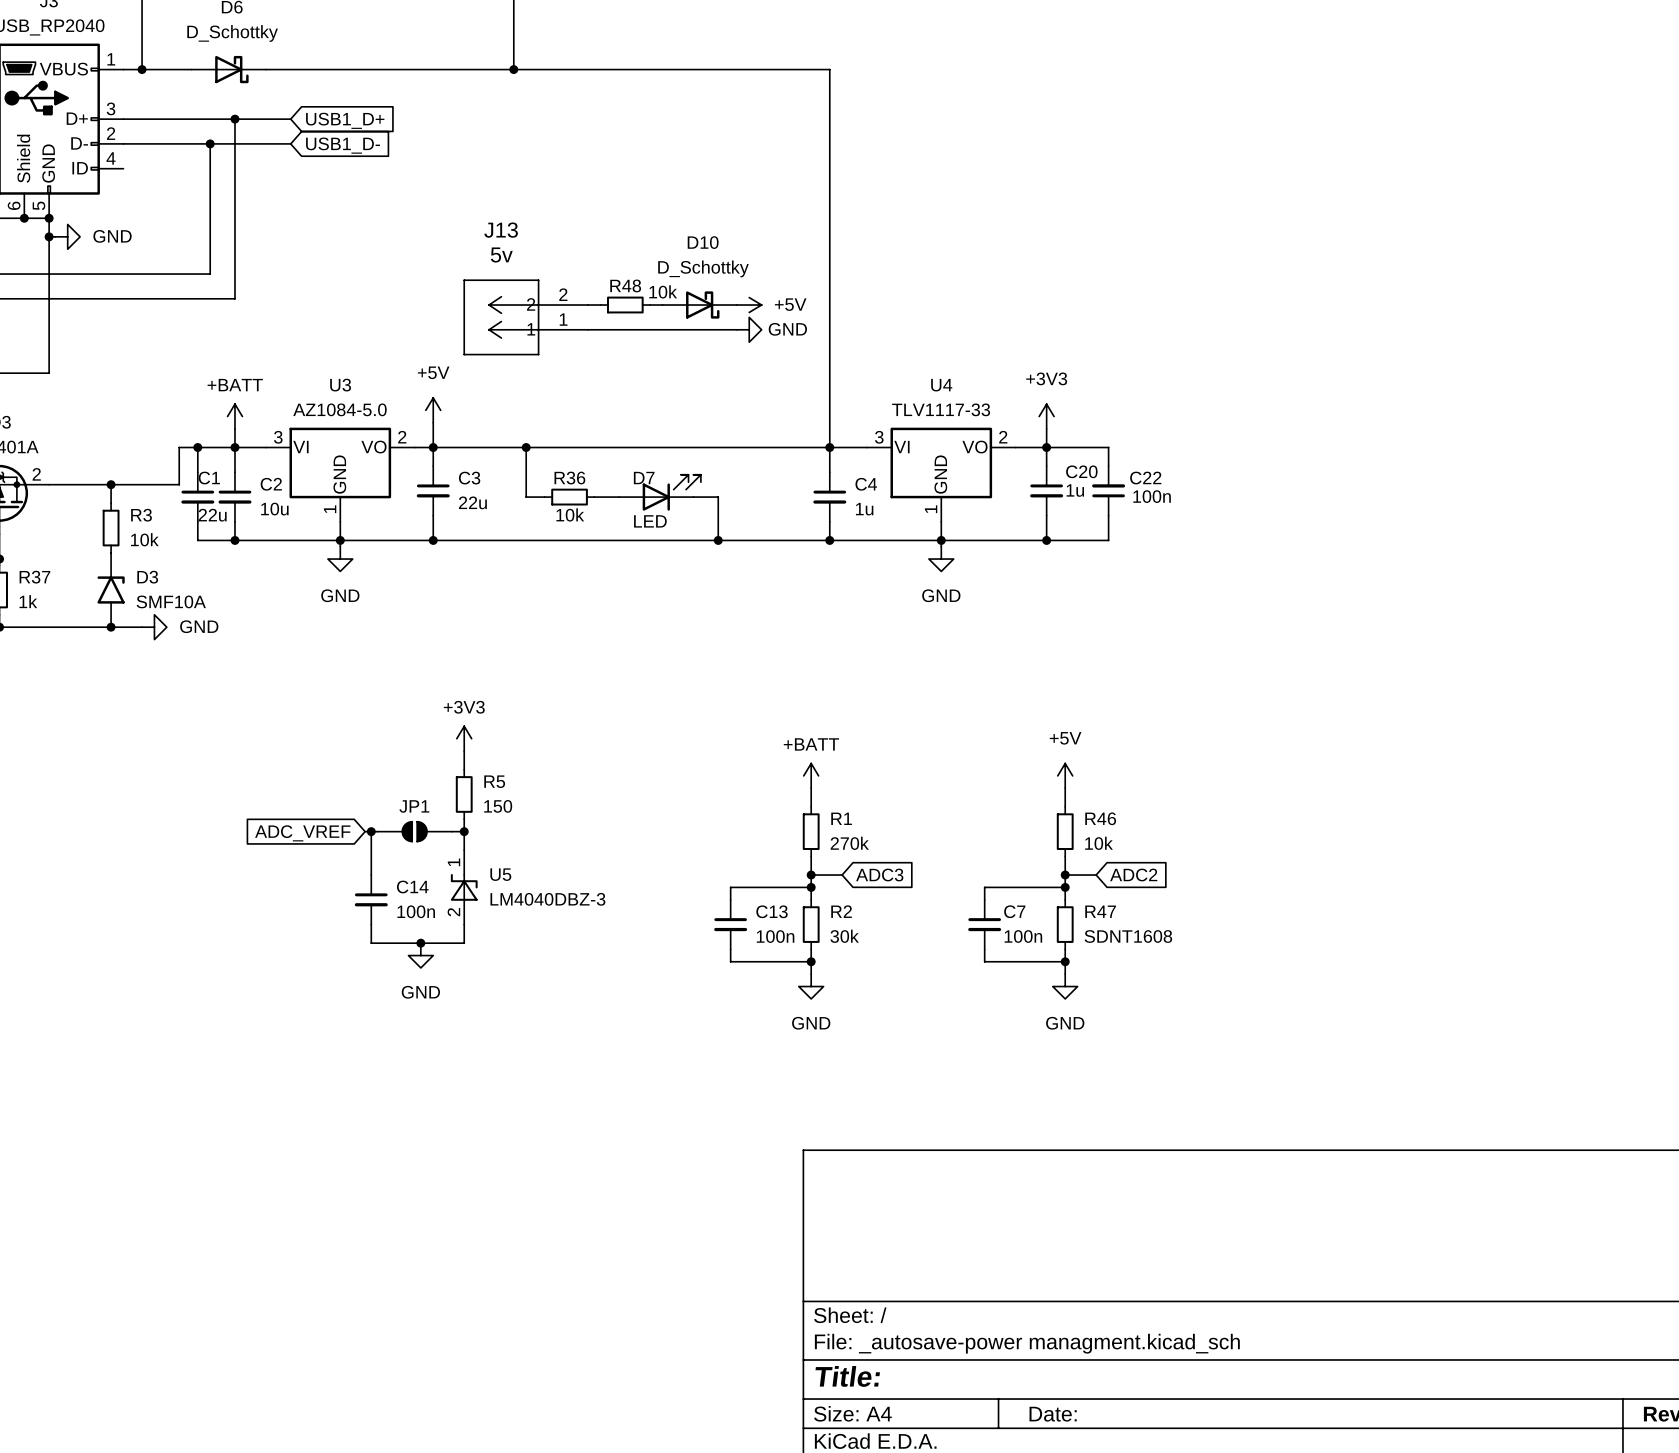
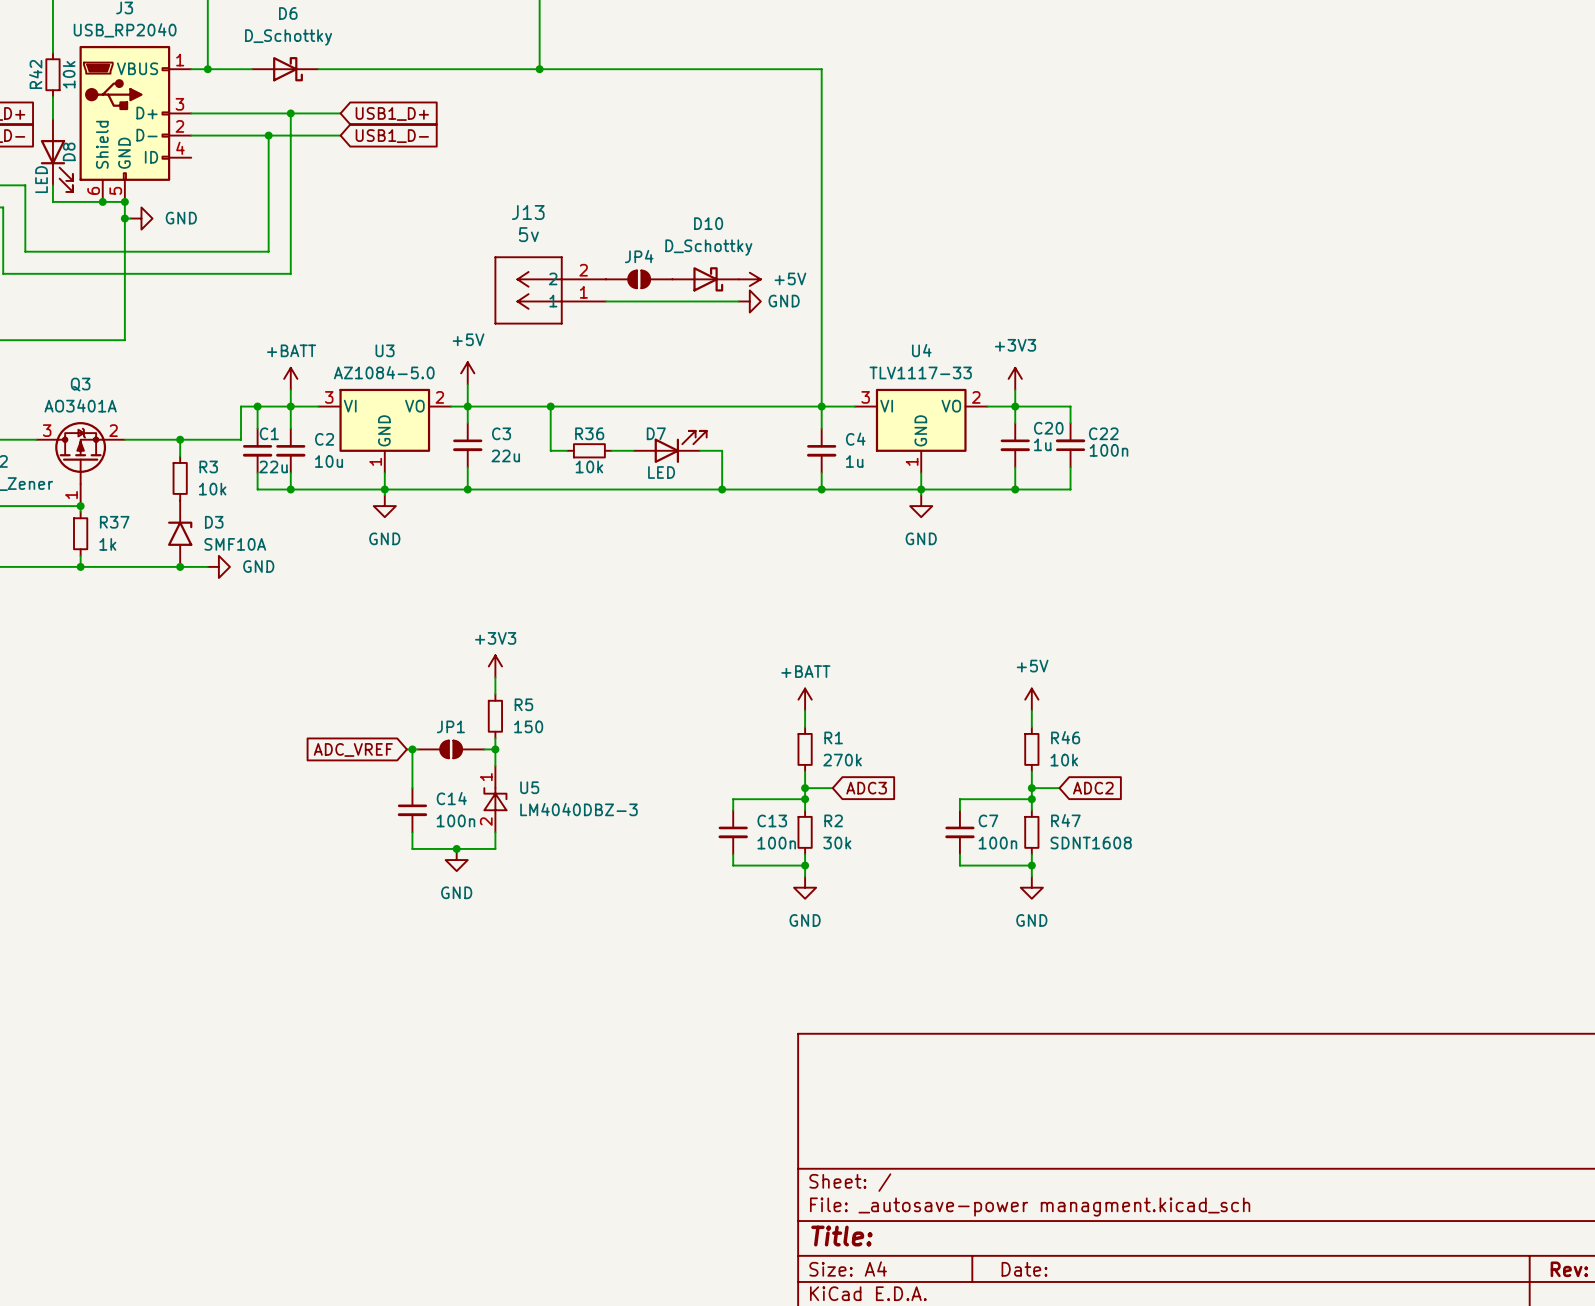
R48: 10k (625, 305) -> none
JP4: none -> (639, 279)

